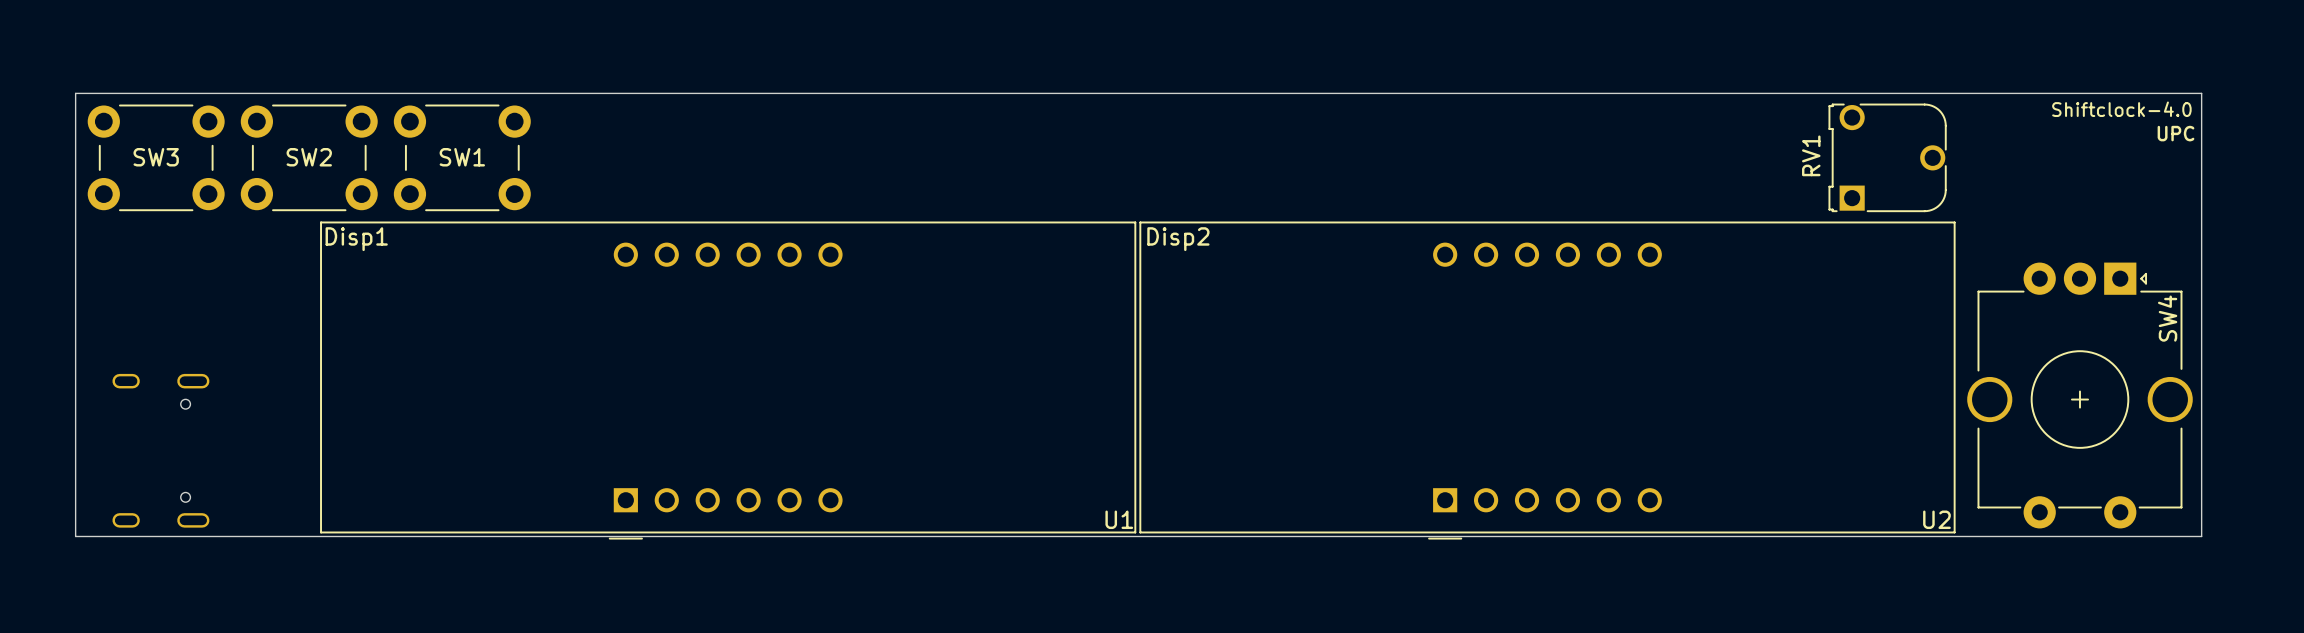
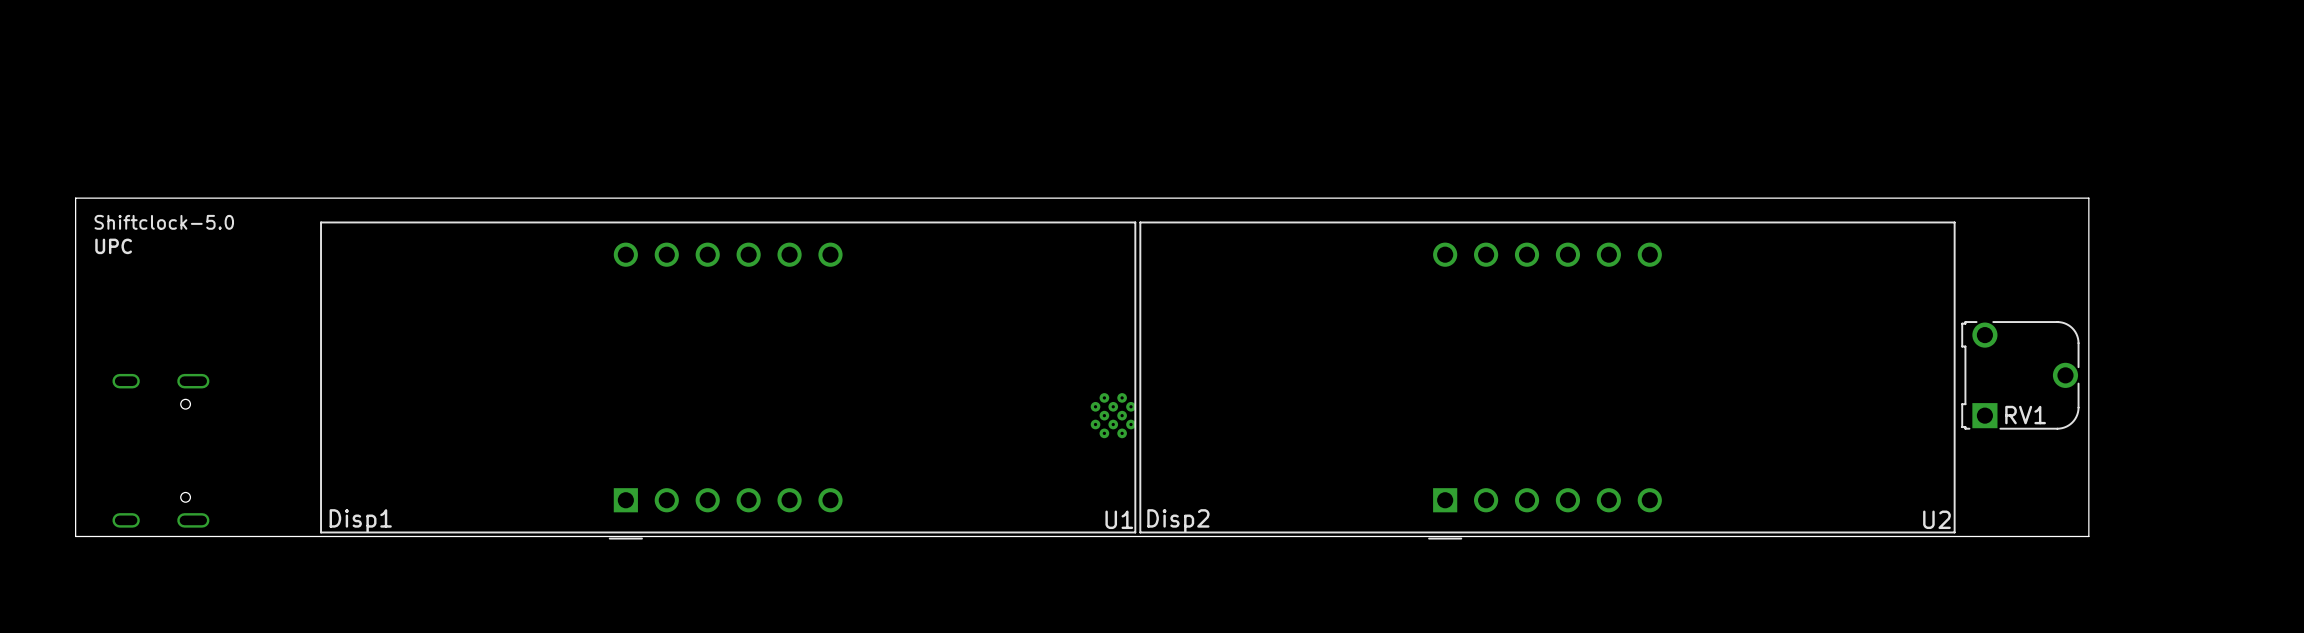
text: Shiftclock-4.0 (2121, 109) -> none
text: UPC (2175, 133) -> none
RV1 name rotation: 0° (1811, 155) -> 90° clockwise (2025, 415)
RV1 name position: RV1 (1811, 155) -> RV1 (2025, 415)
SW3: (156, 157) -> none
SW2: (309, 157) -> none
SW1: (462, 157) -> none
RV1 position: (1887, 157) -> (2020, 375)
board edge: (75, 198) (75, 93) (2201, 93) (2201, 536) (2088, 536) -> (75, 198) (2088, 198) (2088, 536)
text: none -> Shiftclock-5.0 (164, 222)
text position: Disp1 (356, 239) -> Disp1 (360, 521)
text position: Disp2 (1178, 239) -> Disp2 (1178, 521)
text: none -> UPC (113, 246)
SW4: (2079, 395) -> none
part: none -> (1113, 415)

